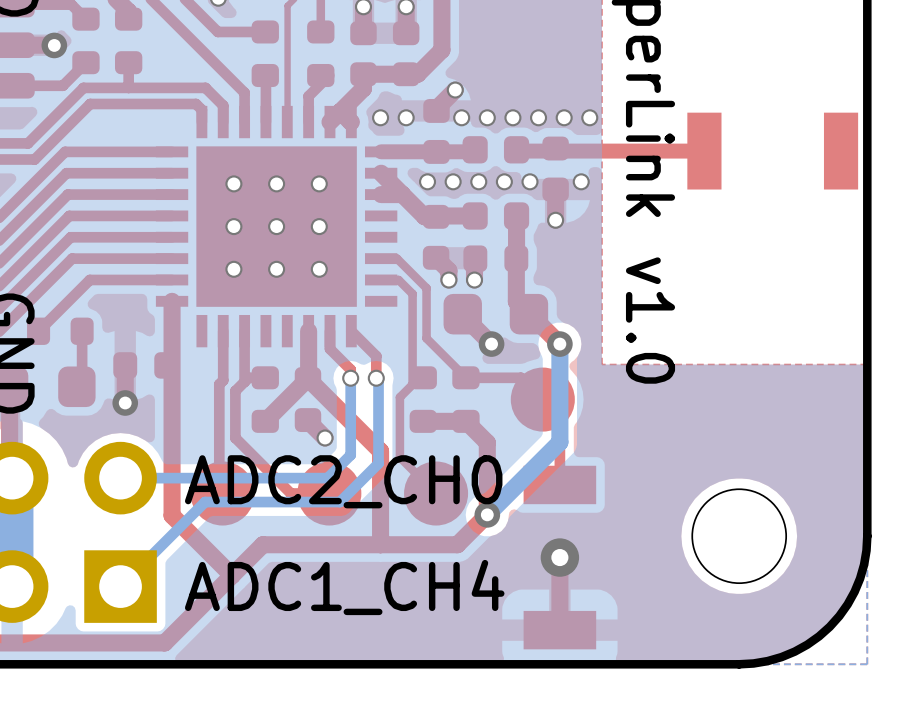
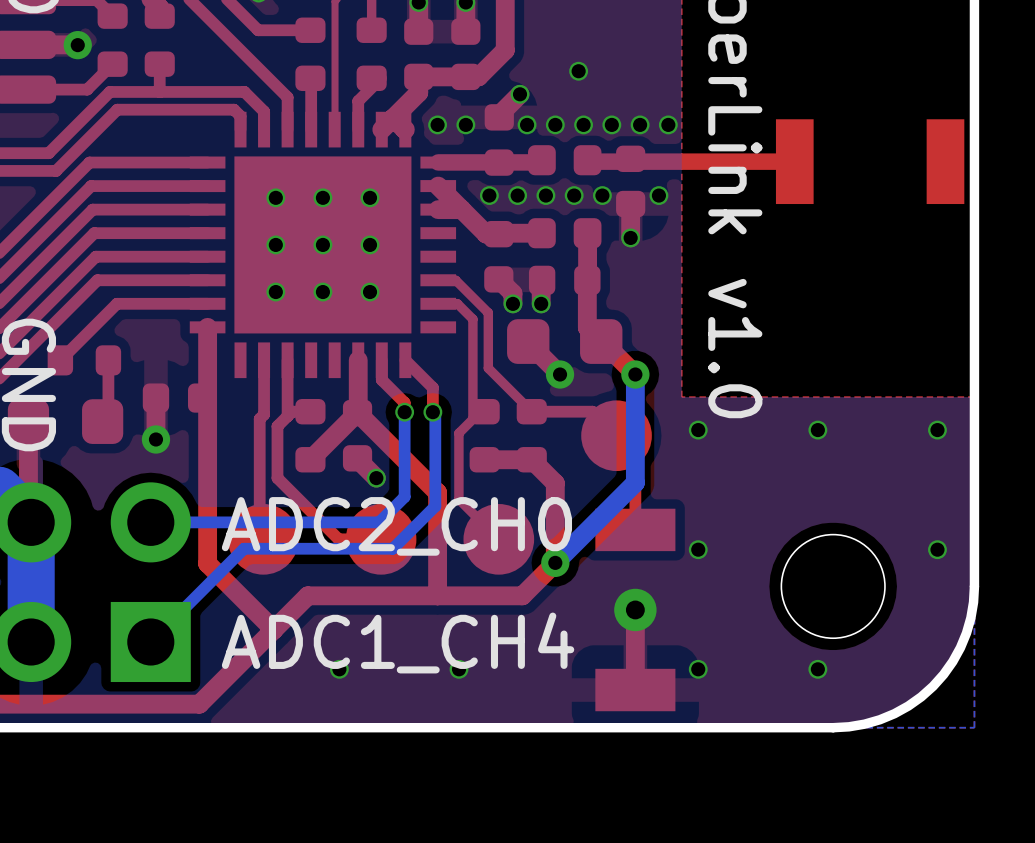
via: none -> (578, 71)
via: none -> (698, 430)
via: none -> (817, 430)
via: none -> (937, 430)
via: none -> (698, 549)
via: none -> (937, 549)
via: none -> (339, 669)
via: none -> (459, 669)
via: none -> (698, 669)
via: none -> (817, 669)

